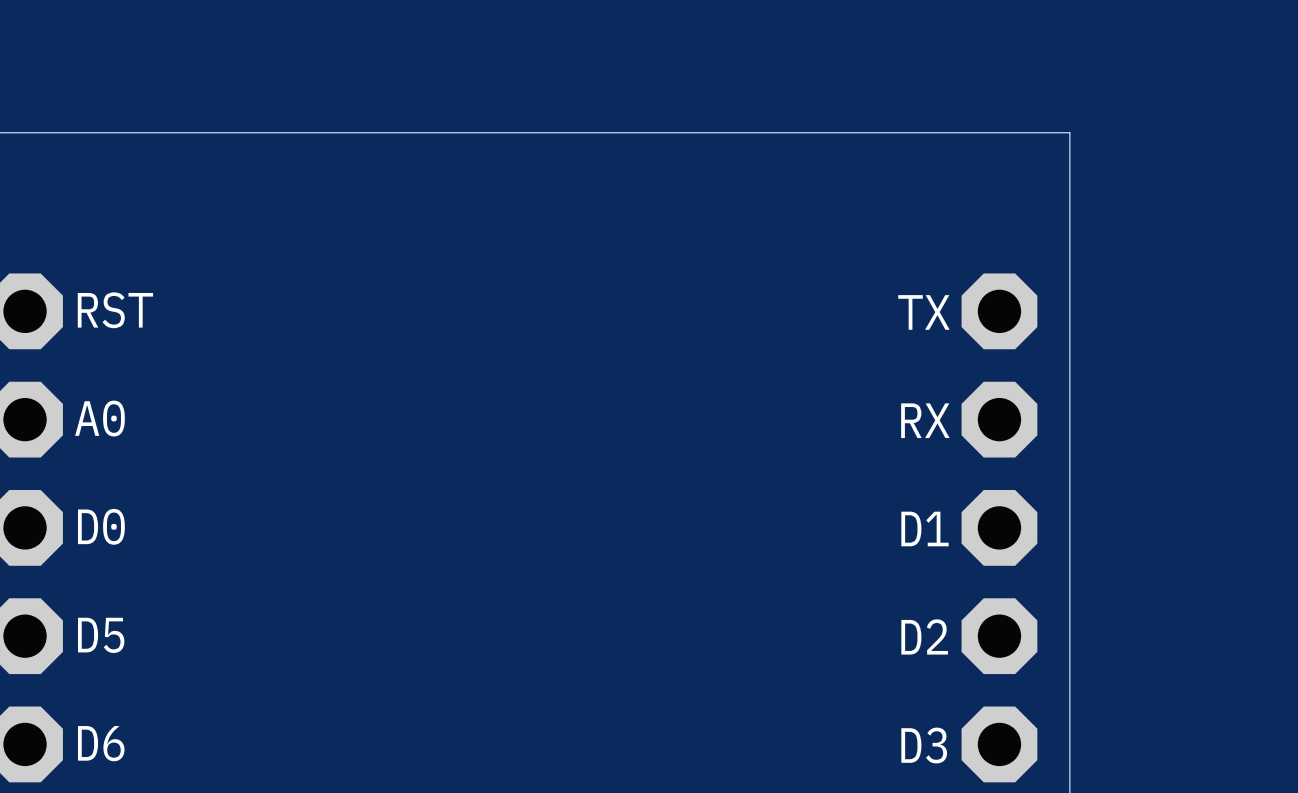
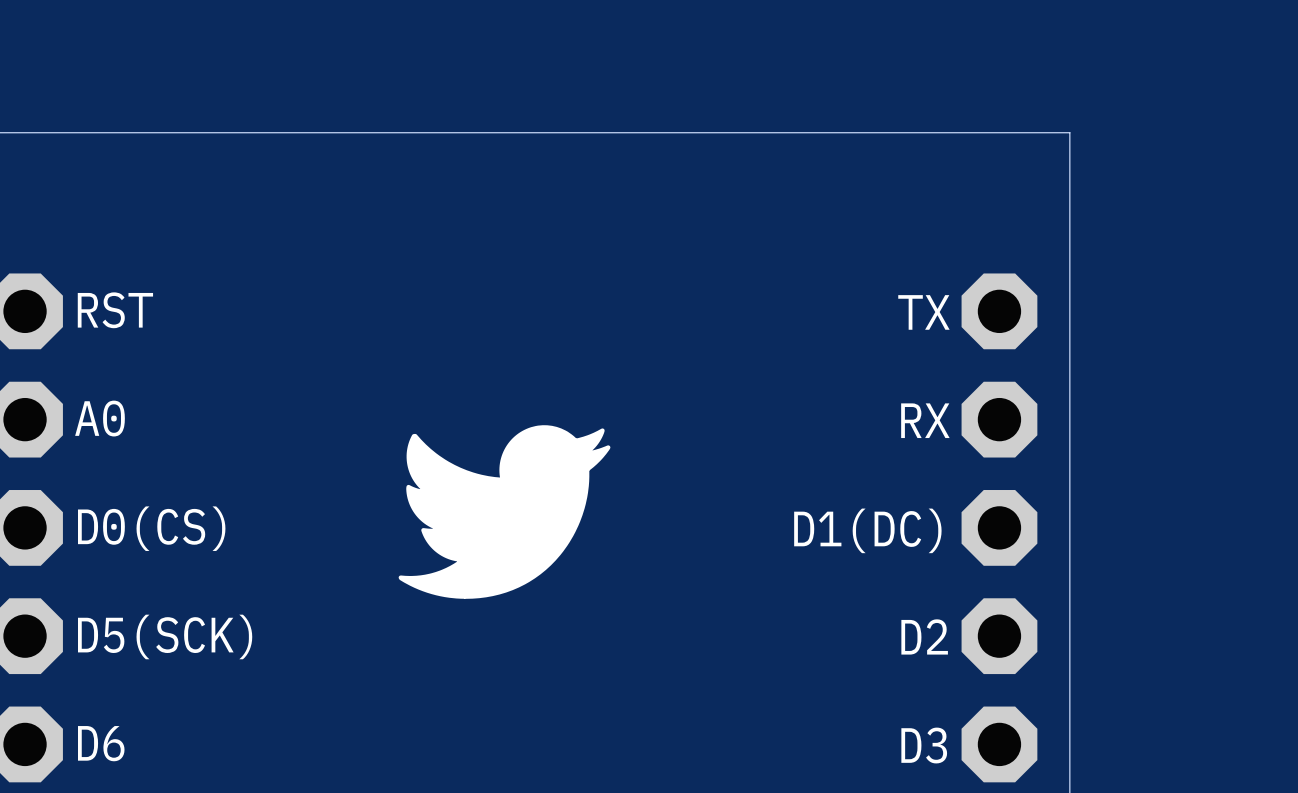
drawing: none -> [398, 425, 611, 599]
text: D0 (101, 526) -> D0(CS) (151, 528)
text: D1 (925, 528) -> D1(DC) (867, 530)
text: D5 (101, 635) -> D5(SCK) (165, 636)

